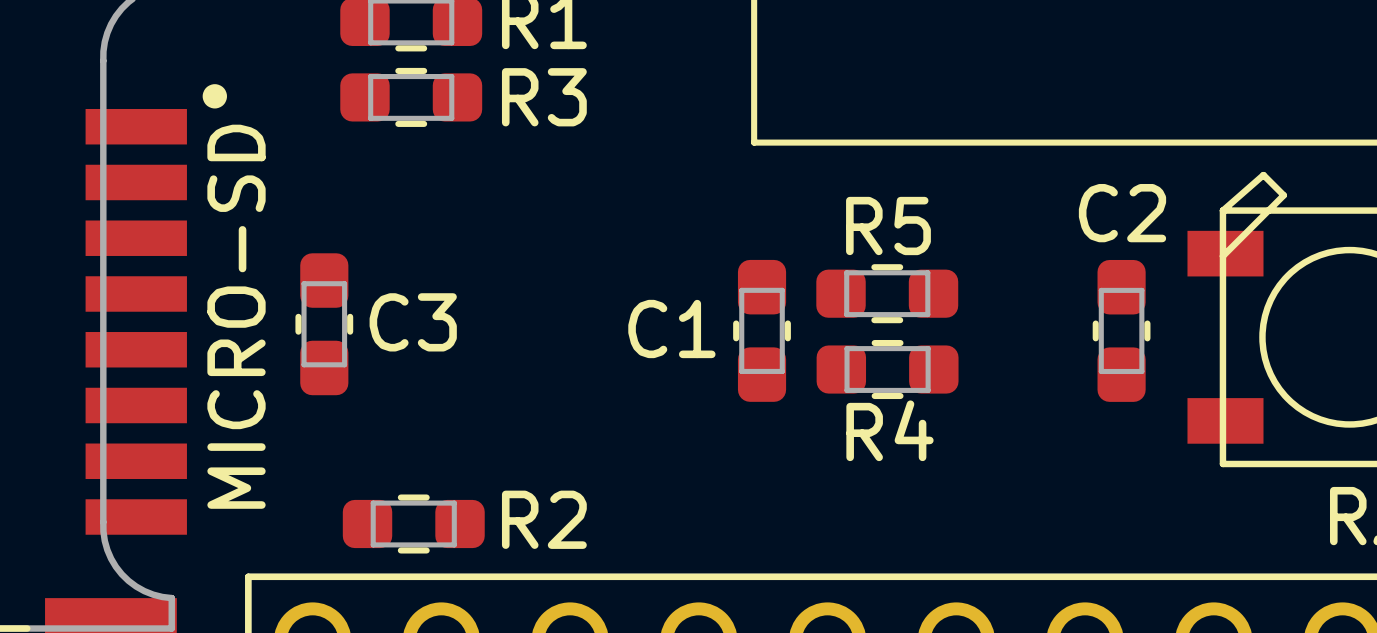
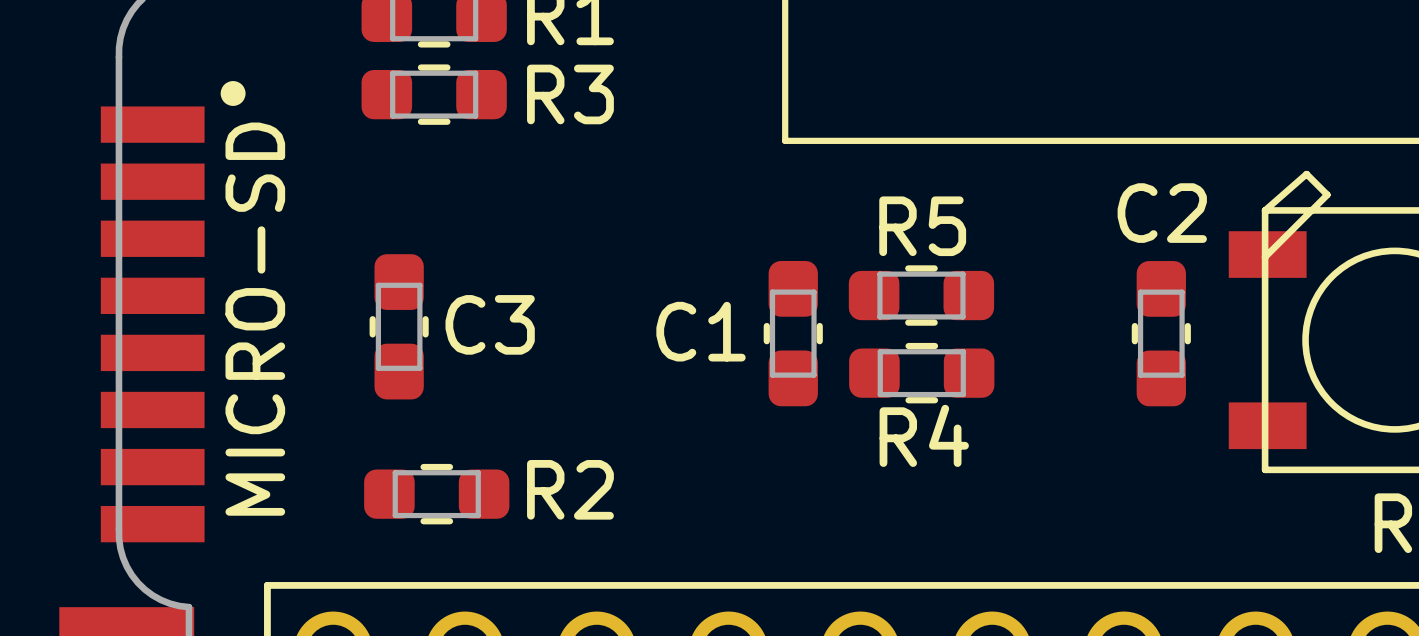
C3 position: (324, 324) -> (399, 326)
R2 position: (413, 524) -> (436, 494)

